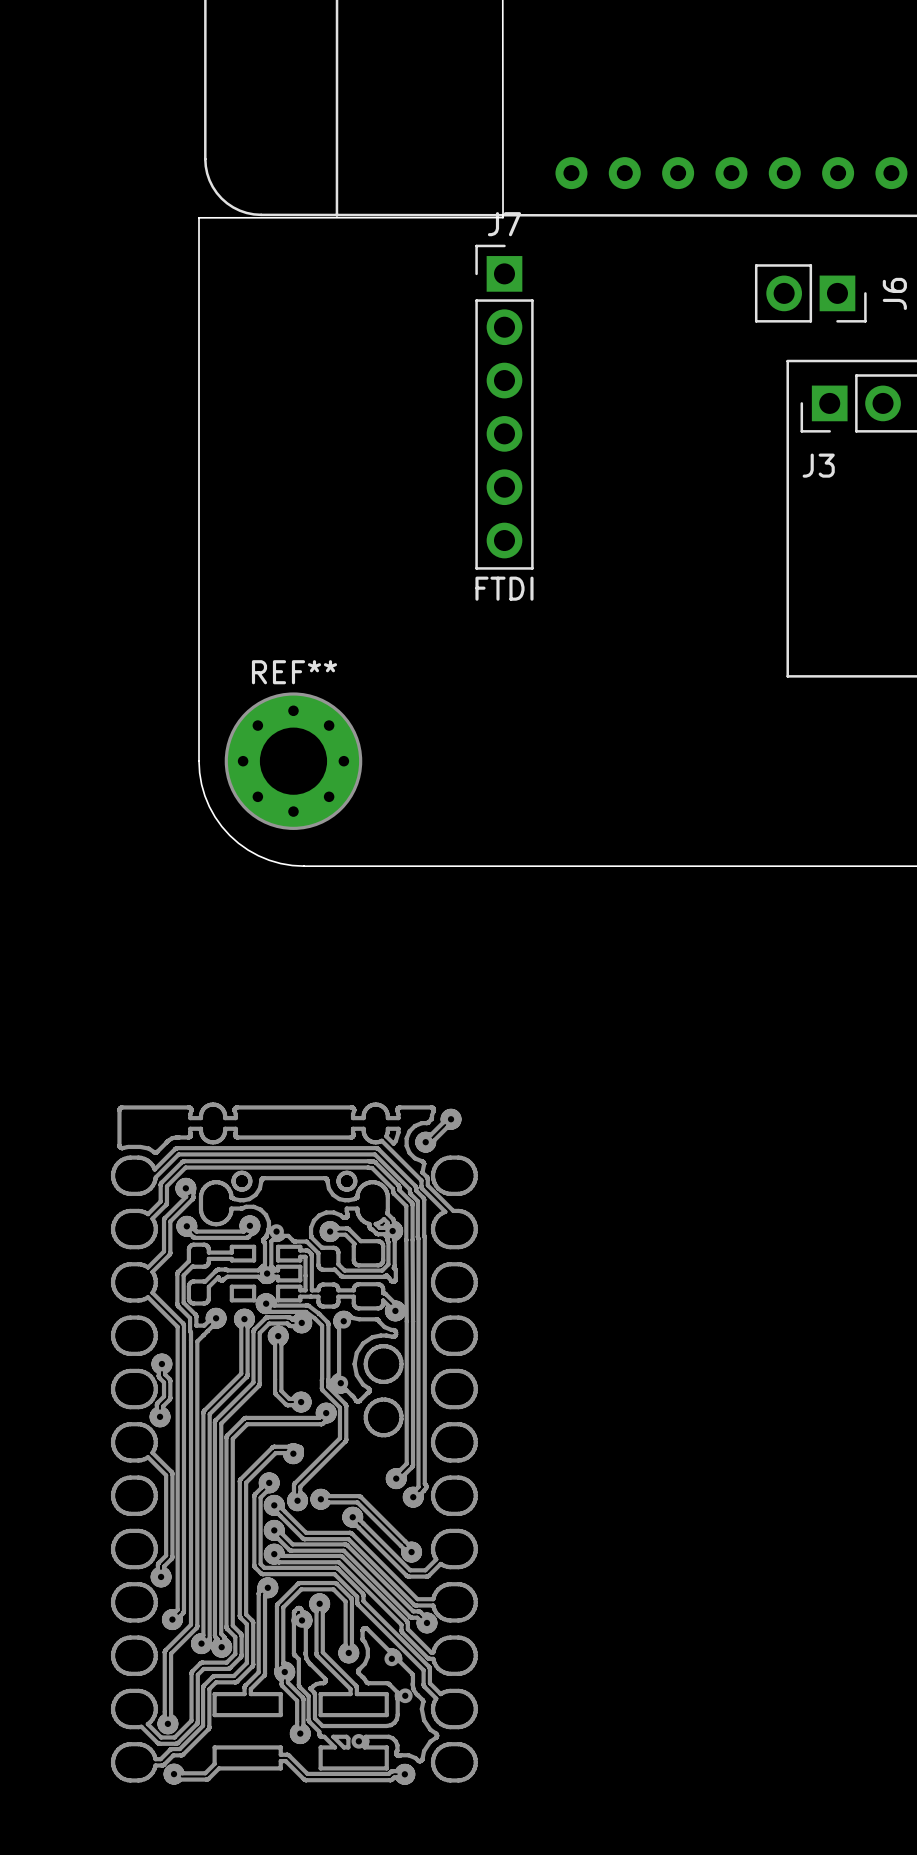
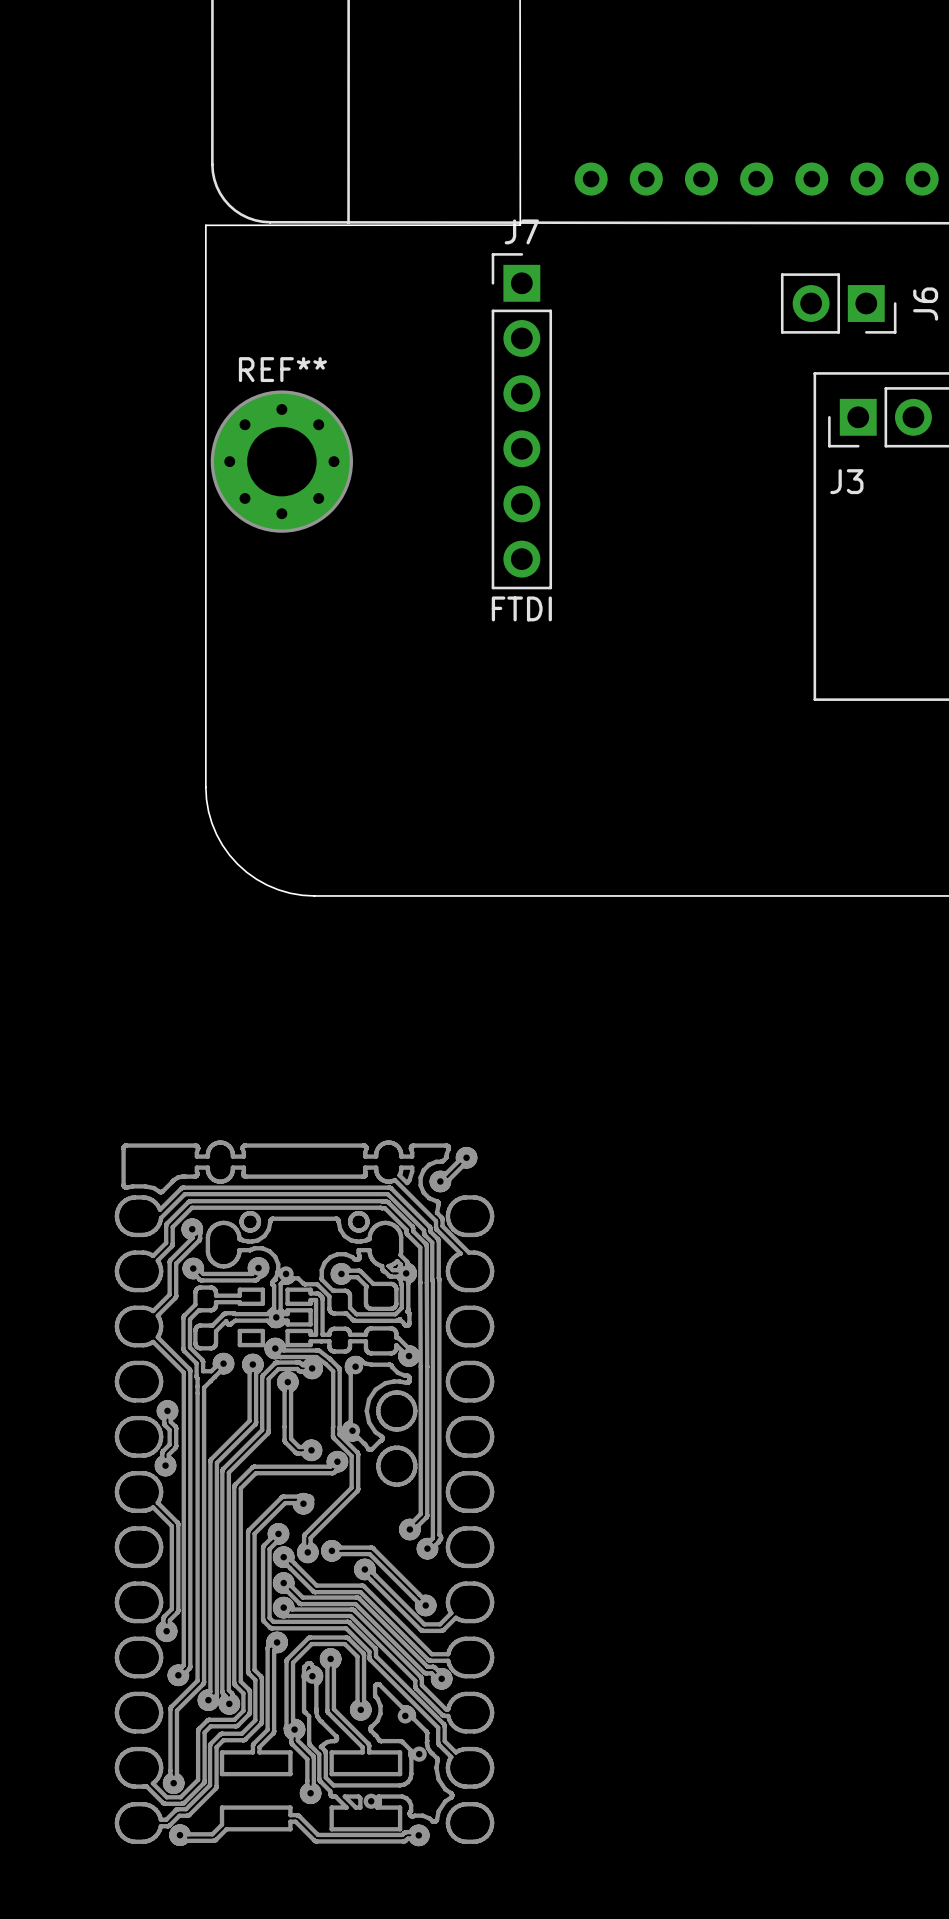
REF** position: (293, 761) -> (281, 461)

